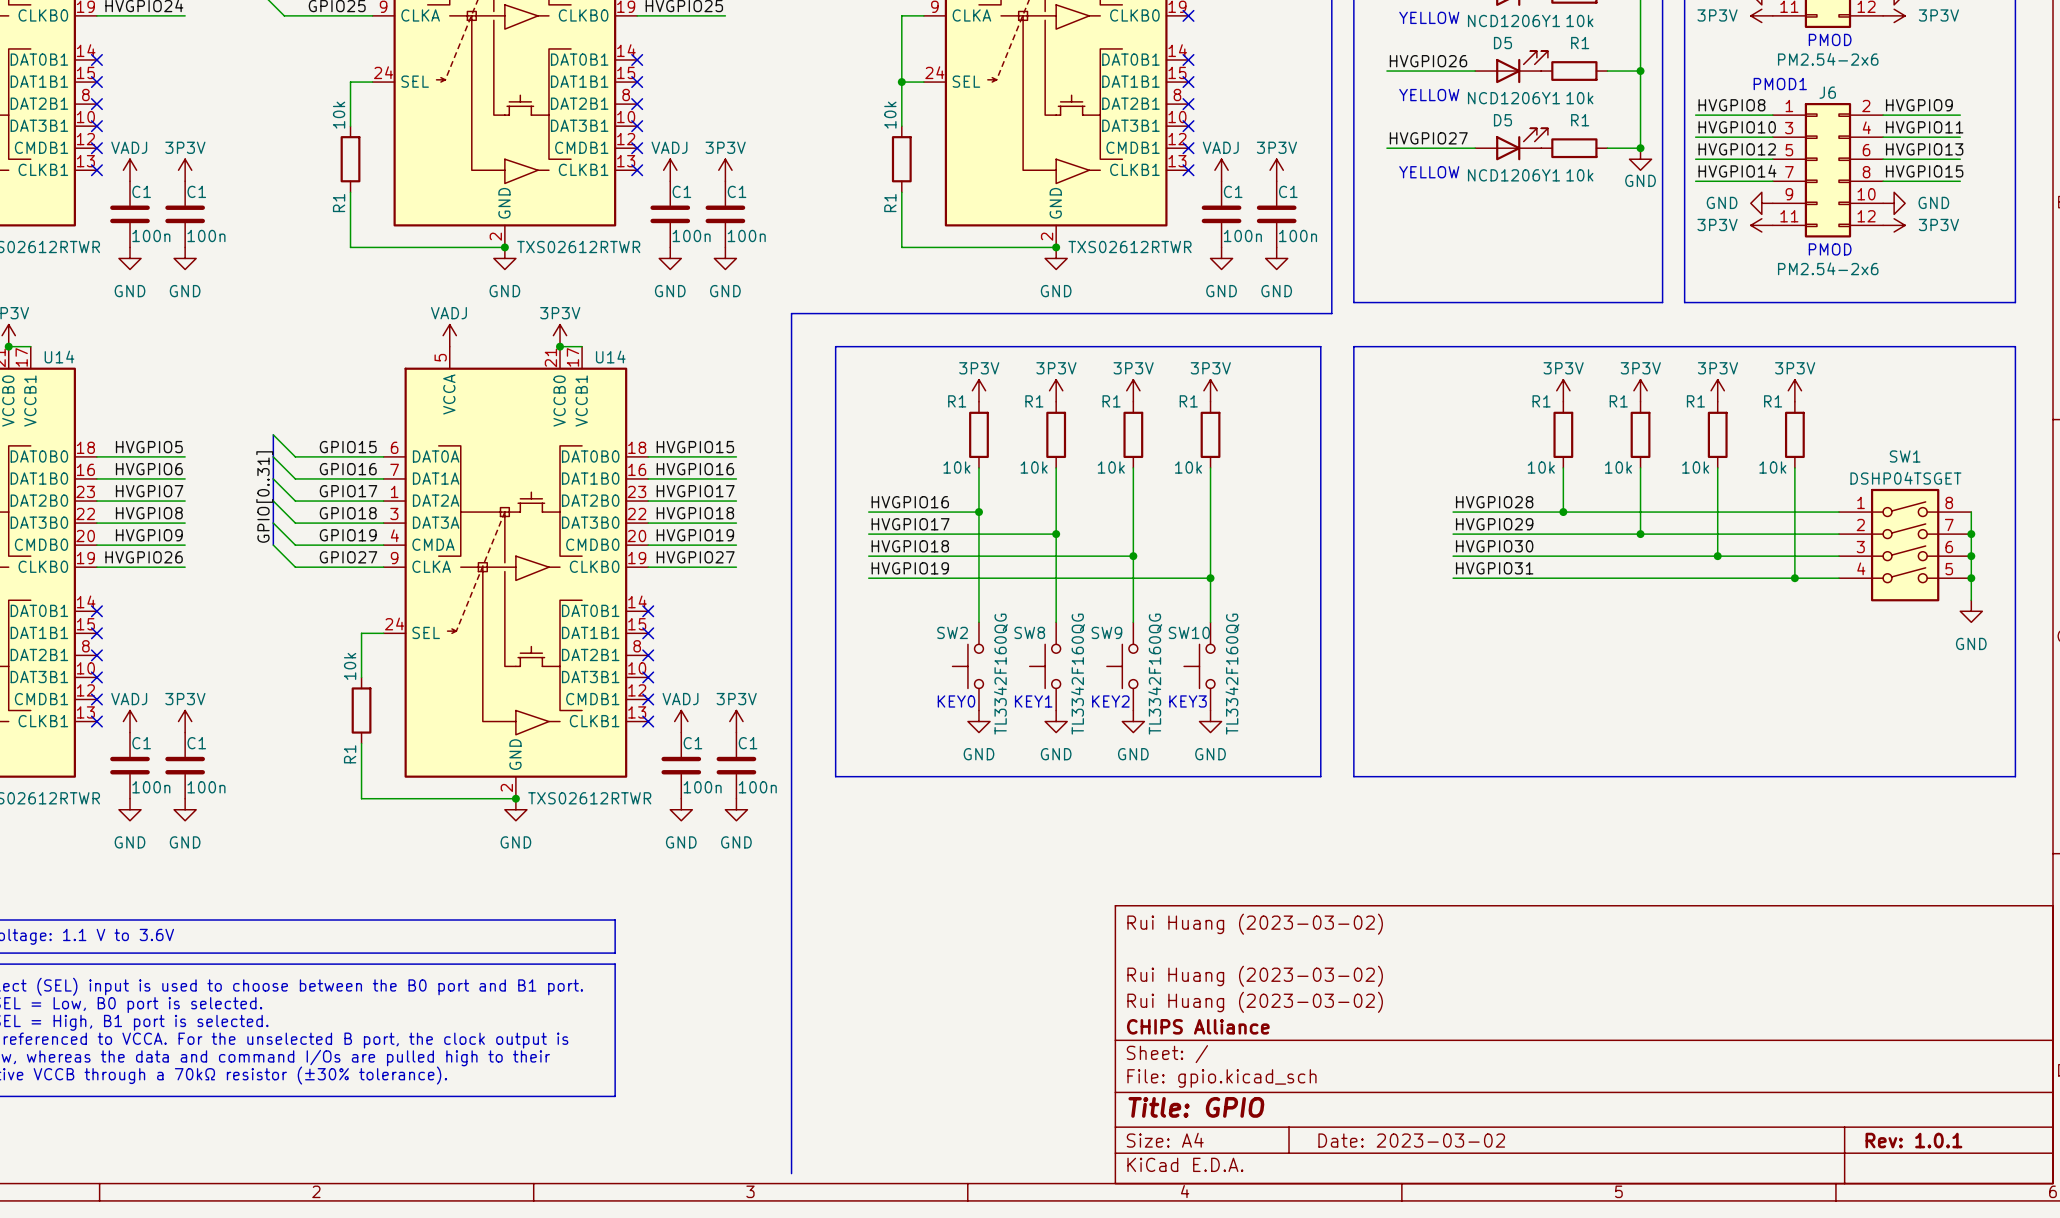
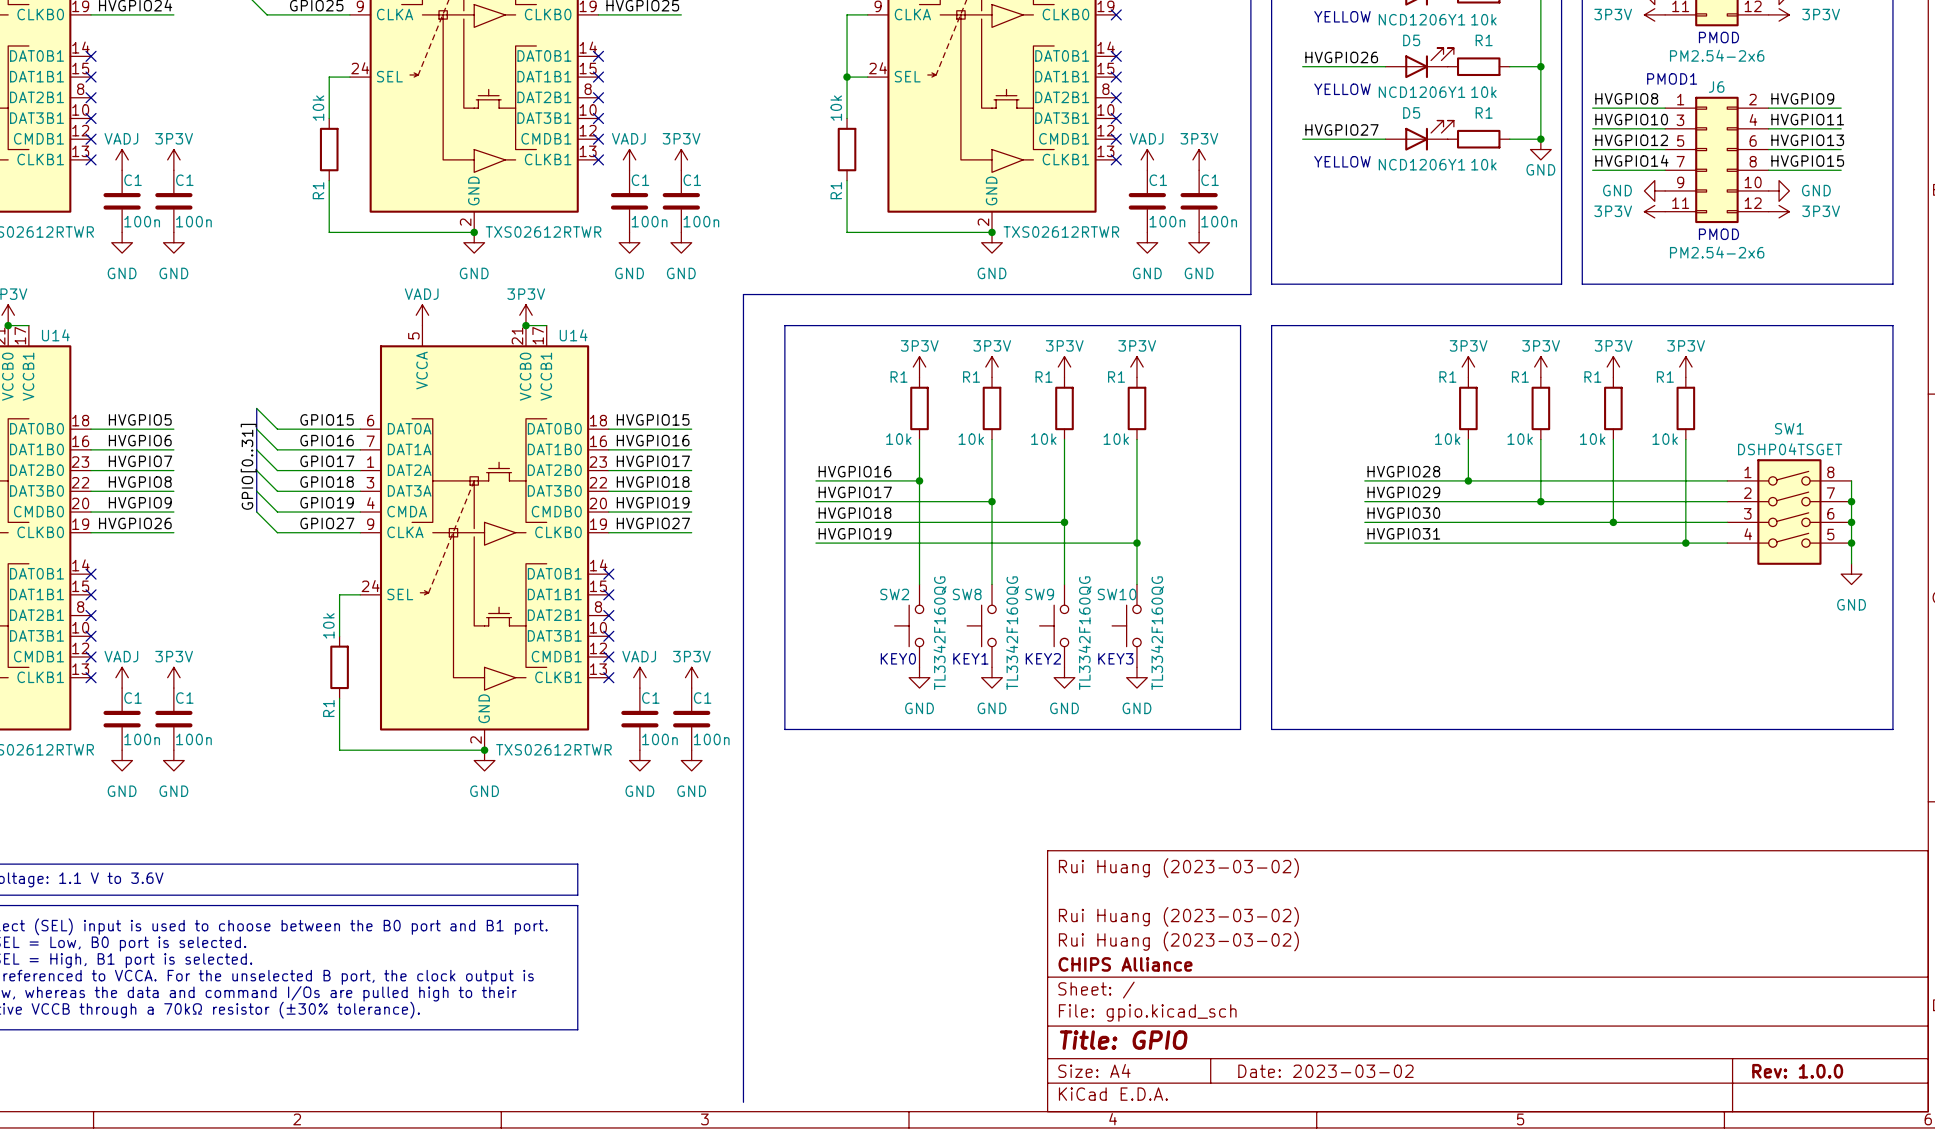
title block: Rev: 1.0.1 (1913, 1140) -> Rev: 1.0.0 (1797, 1071)

